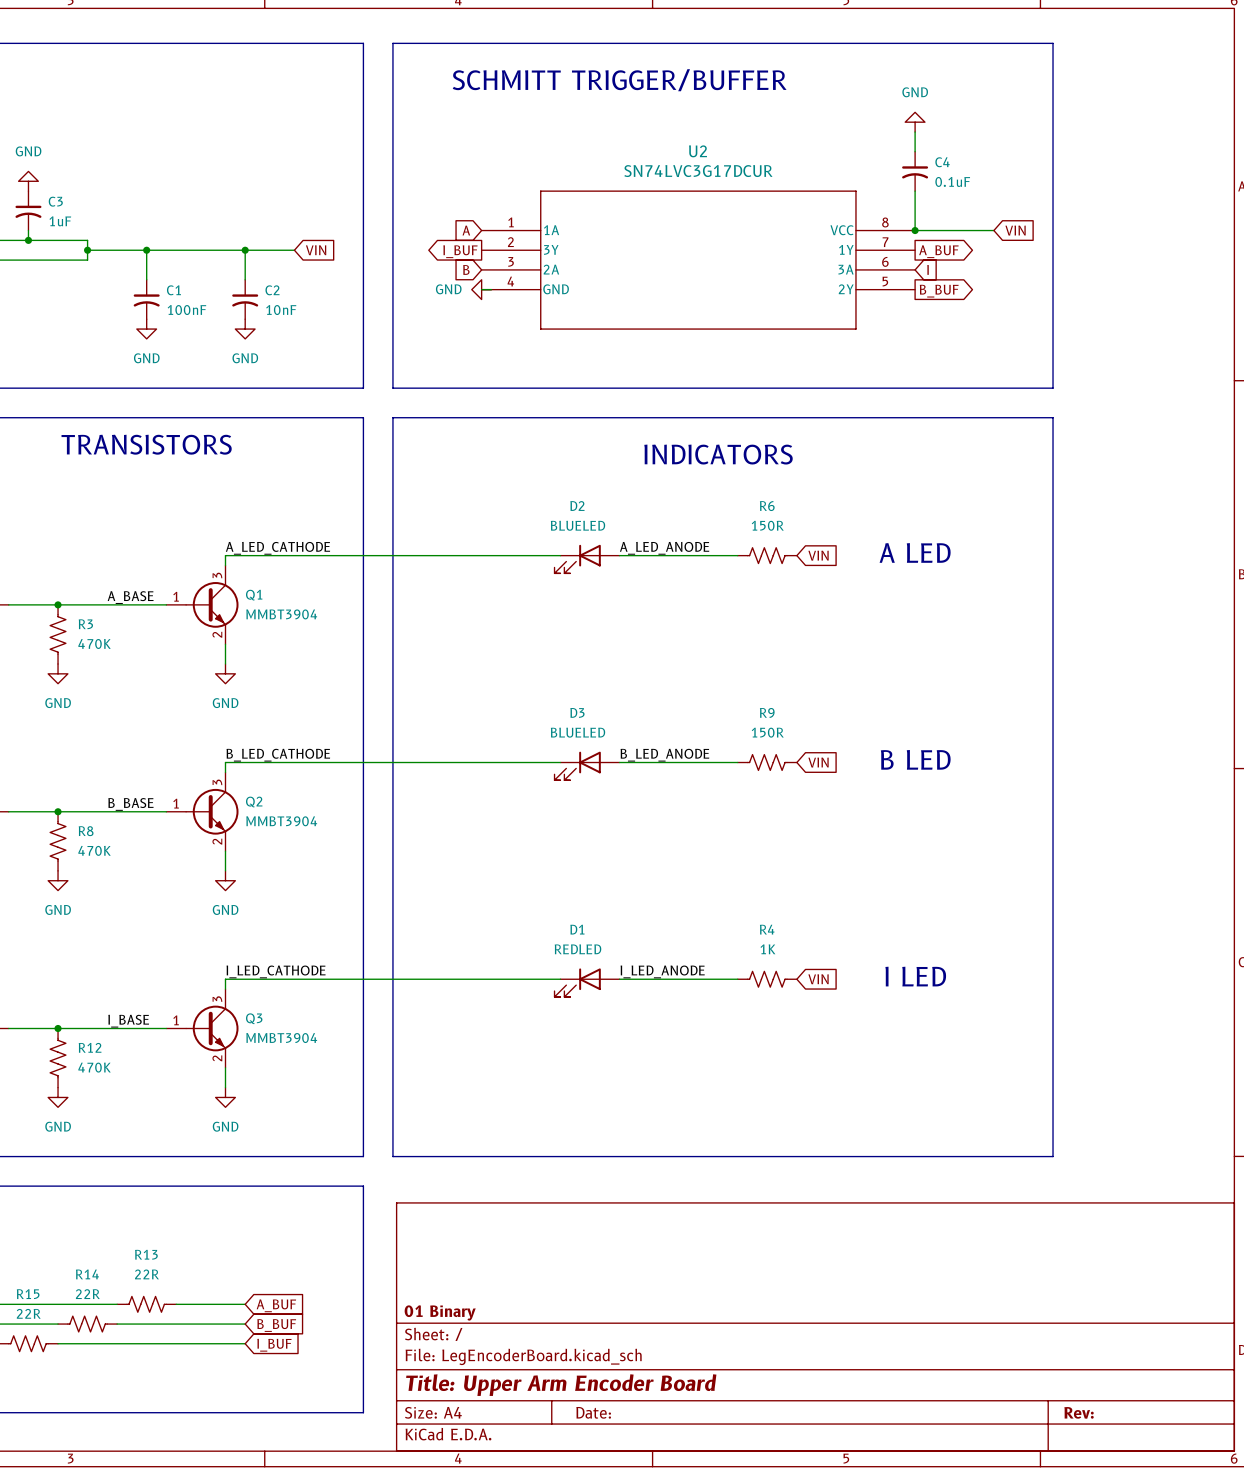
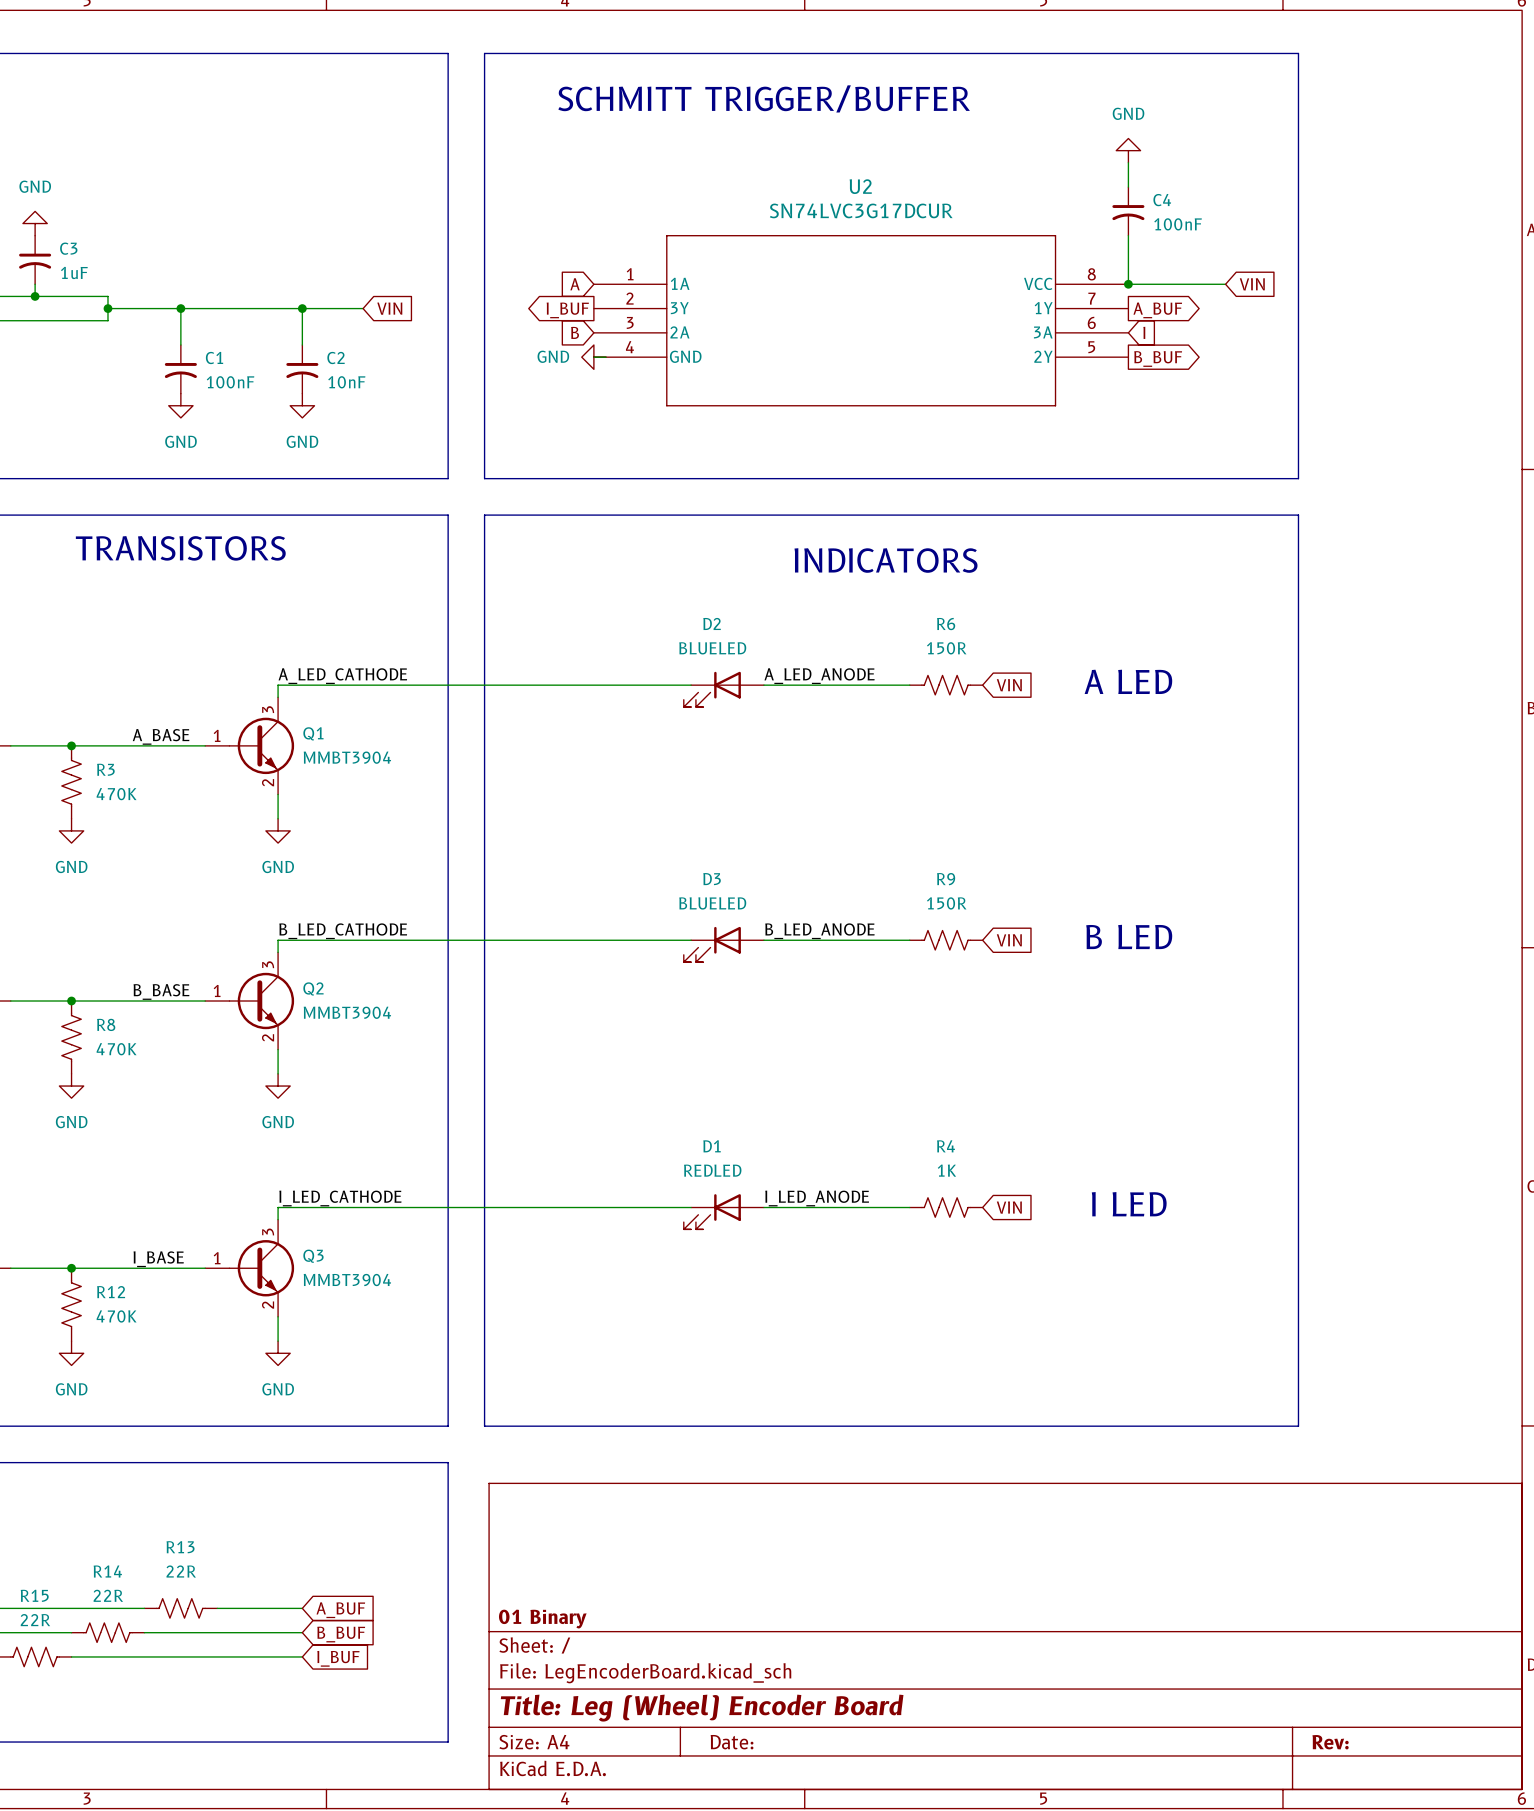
C4 value: 0.1uF (952, 181) -> 100nF (1178, 224)
title block: Title: Upper Arm Encoder Board (561, 1385) -> Title: Leg (Wheel) Encoder Board (702, 1708)

